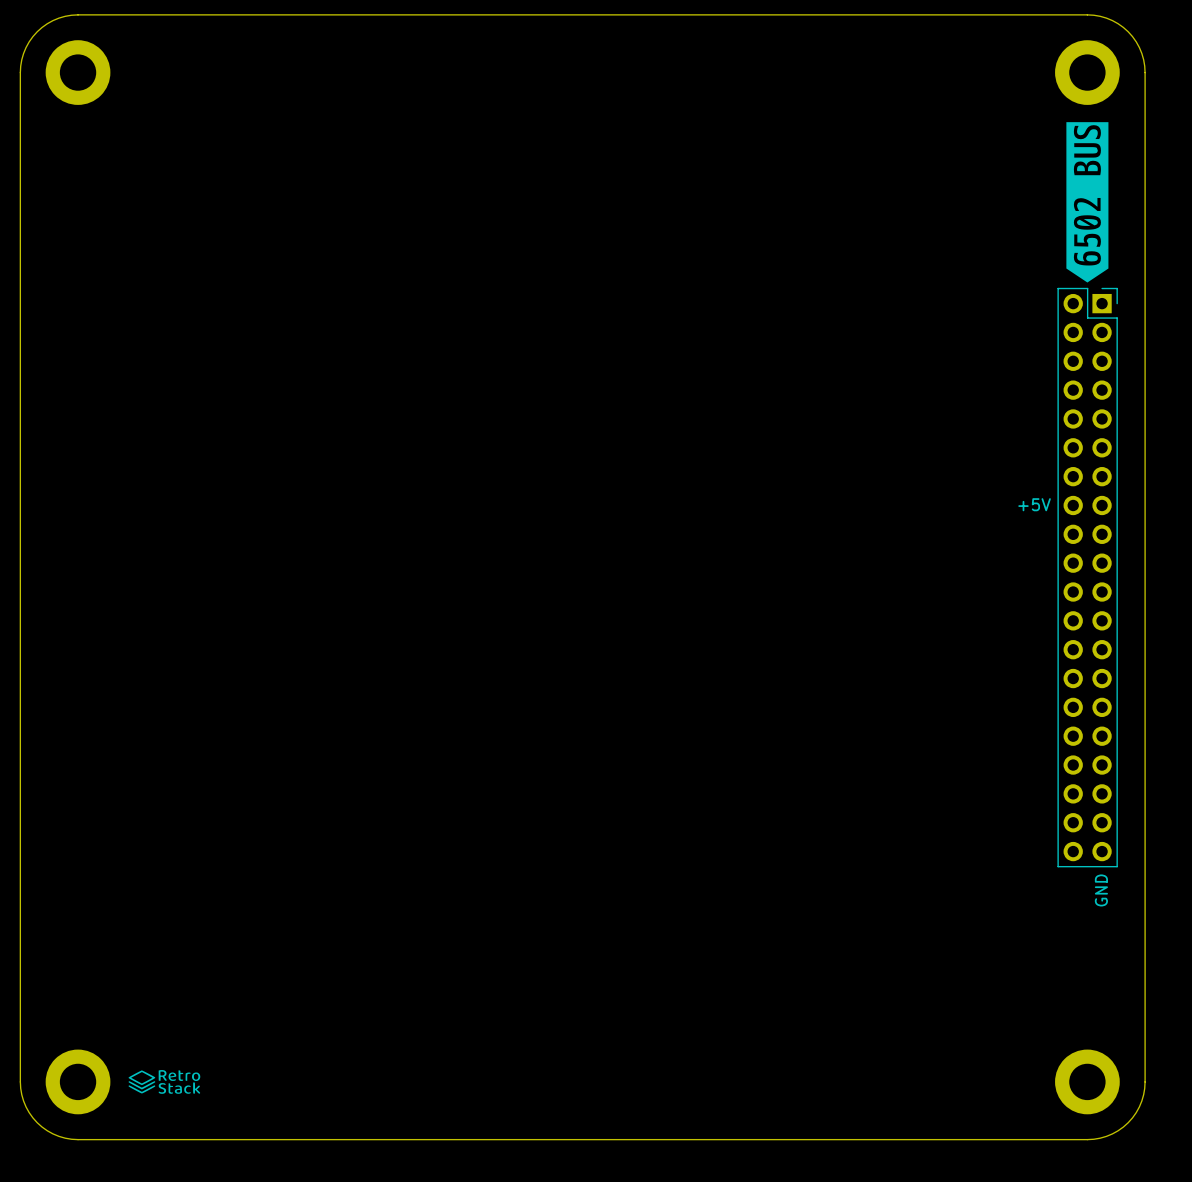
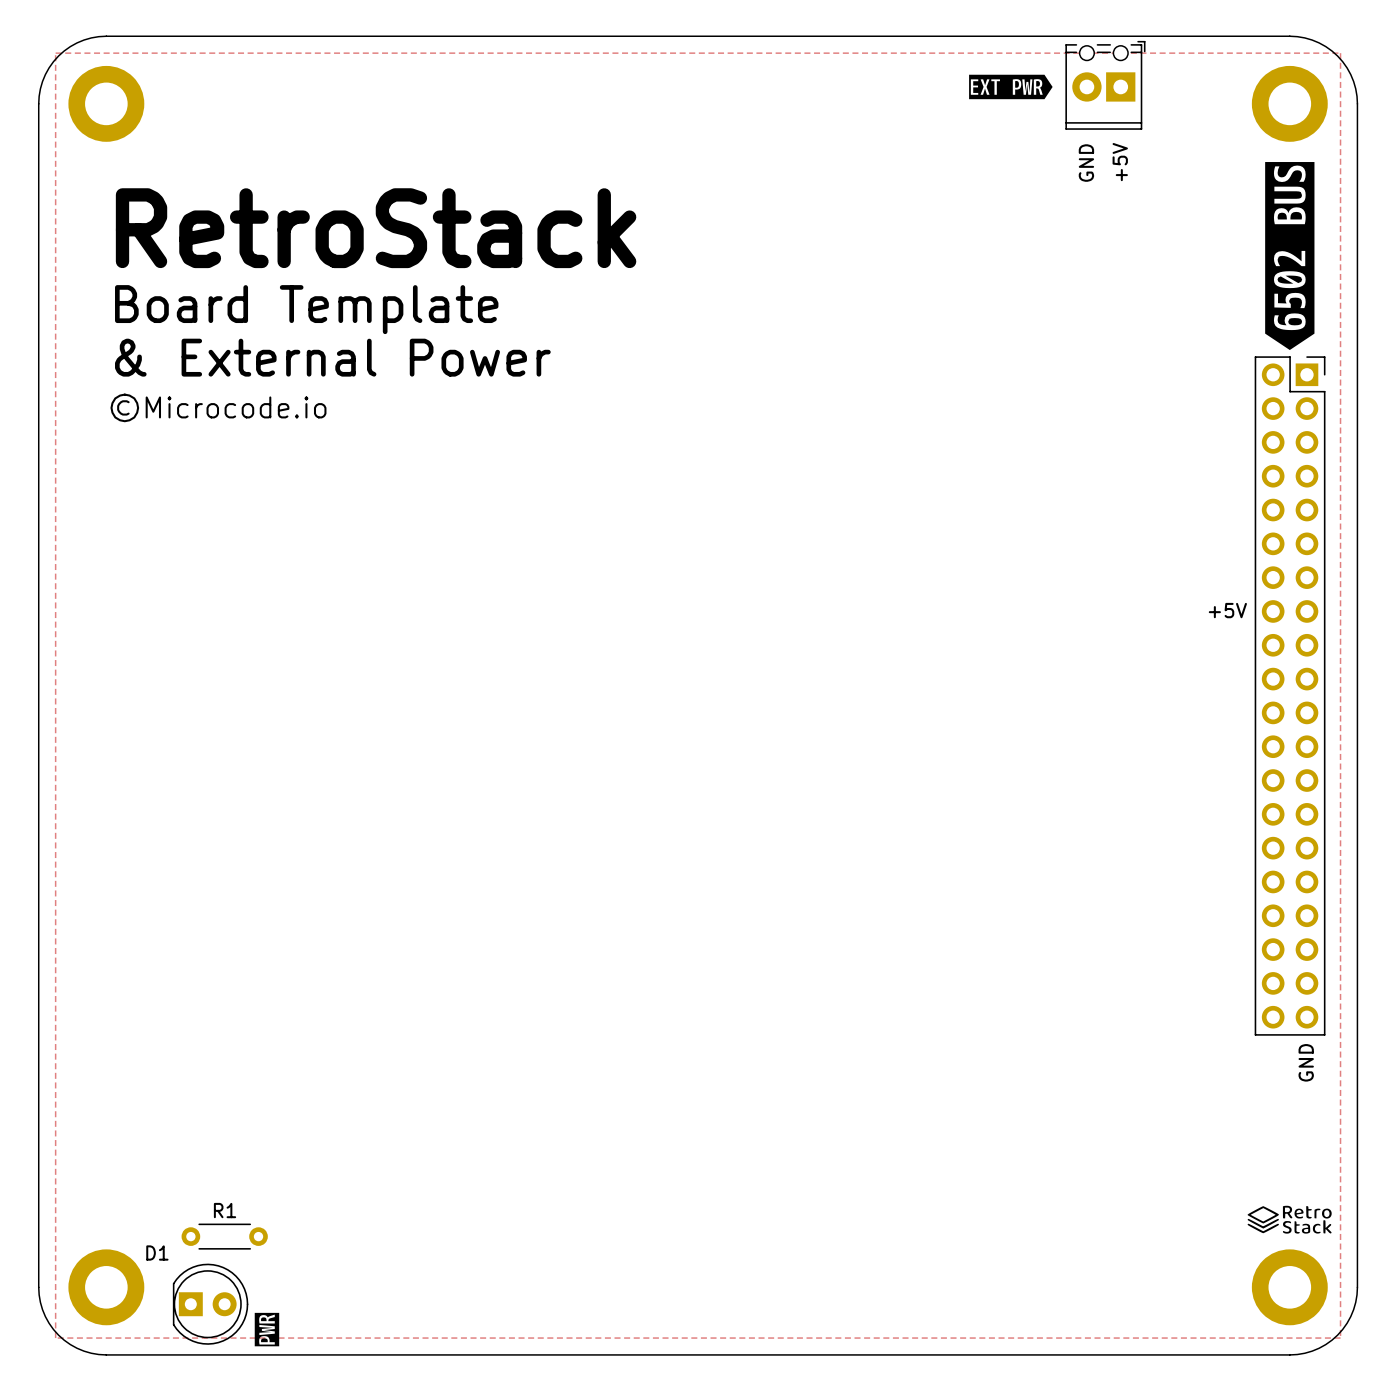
zone outline: none -> (55, 53) (55, 1338) (1340, 1338) (1340, 53) (55, 53)
drawing: none -> [969, 74, 1053, 100]
part: none -> (1105, 85)
text: none -> +5V (1120, 162)
text: none -> GND (1086, 163)
text: none -> RetroStack (376, 228)
text: none -> Board Template (306, 309)
text: none -> & External Power (332, 357)
text: none -> ©Microcode.io (218, 407)
drawing: none -> [1247, 1205, 1332, 1234]
R1: none -> (224, 1236)
drawing: [128, 1070, 201, 1094] -> none
D1: none -> (210, 1304)
drawing: none -> [254, 1312, 280, 1347]

